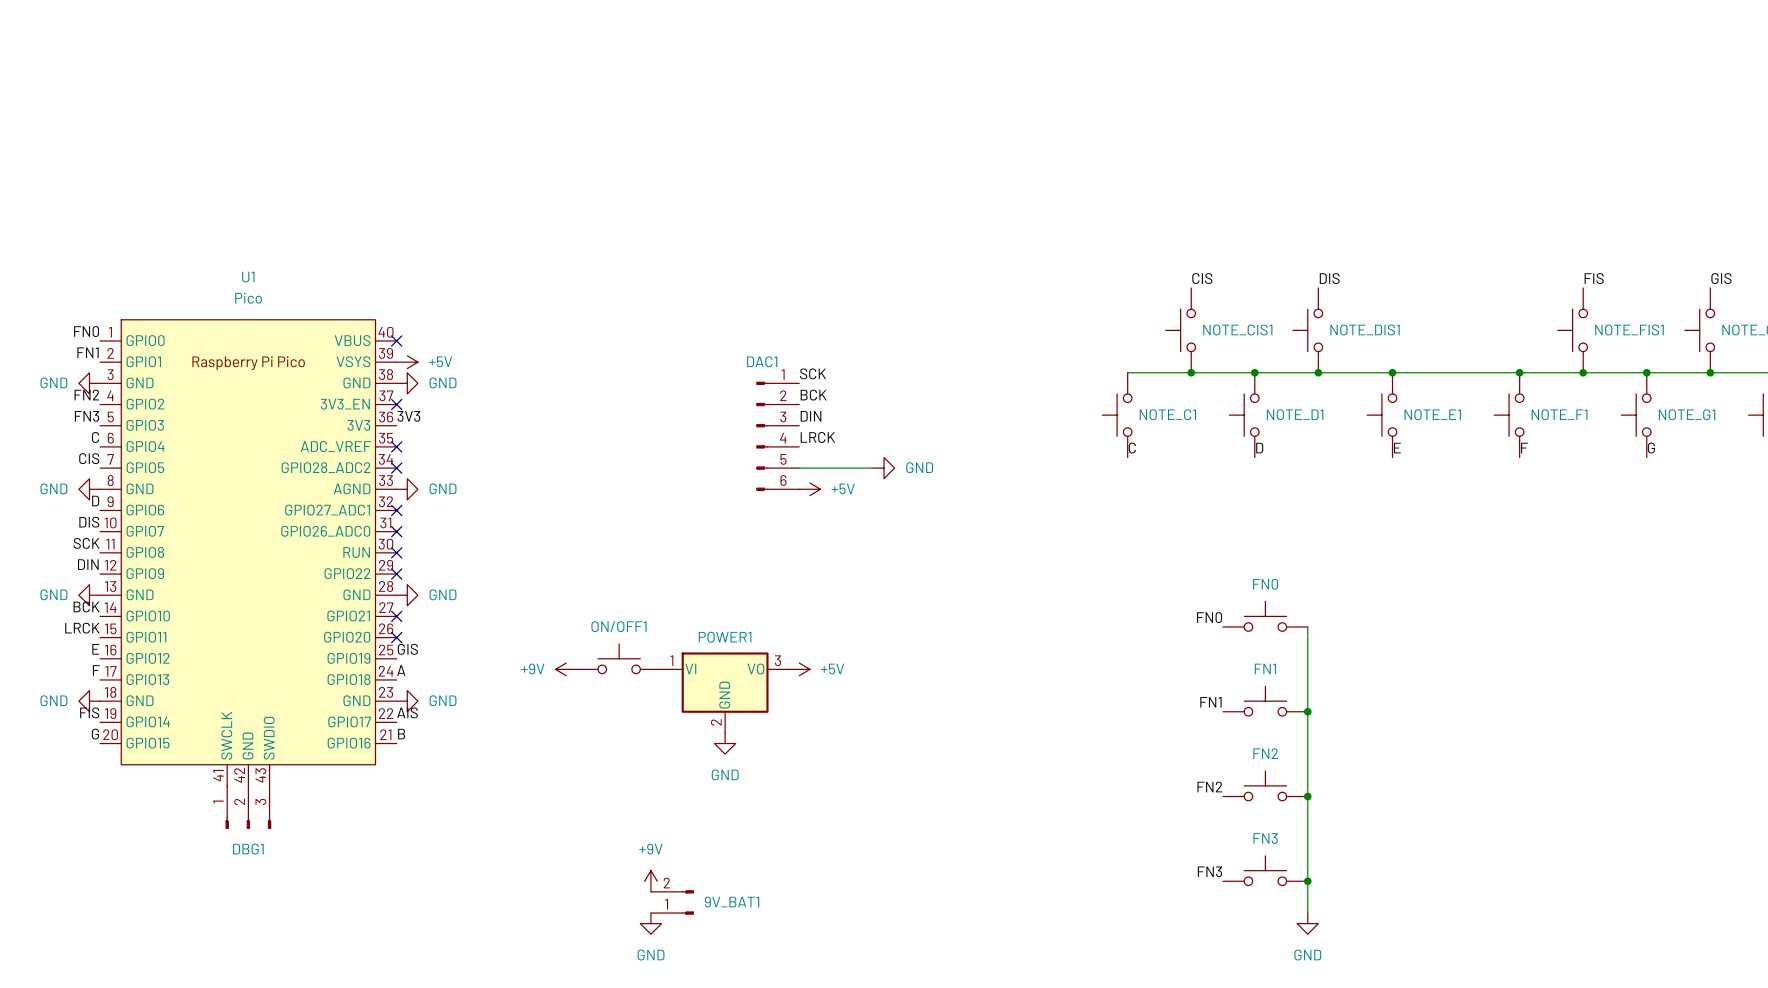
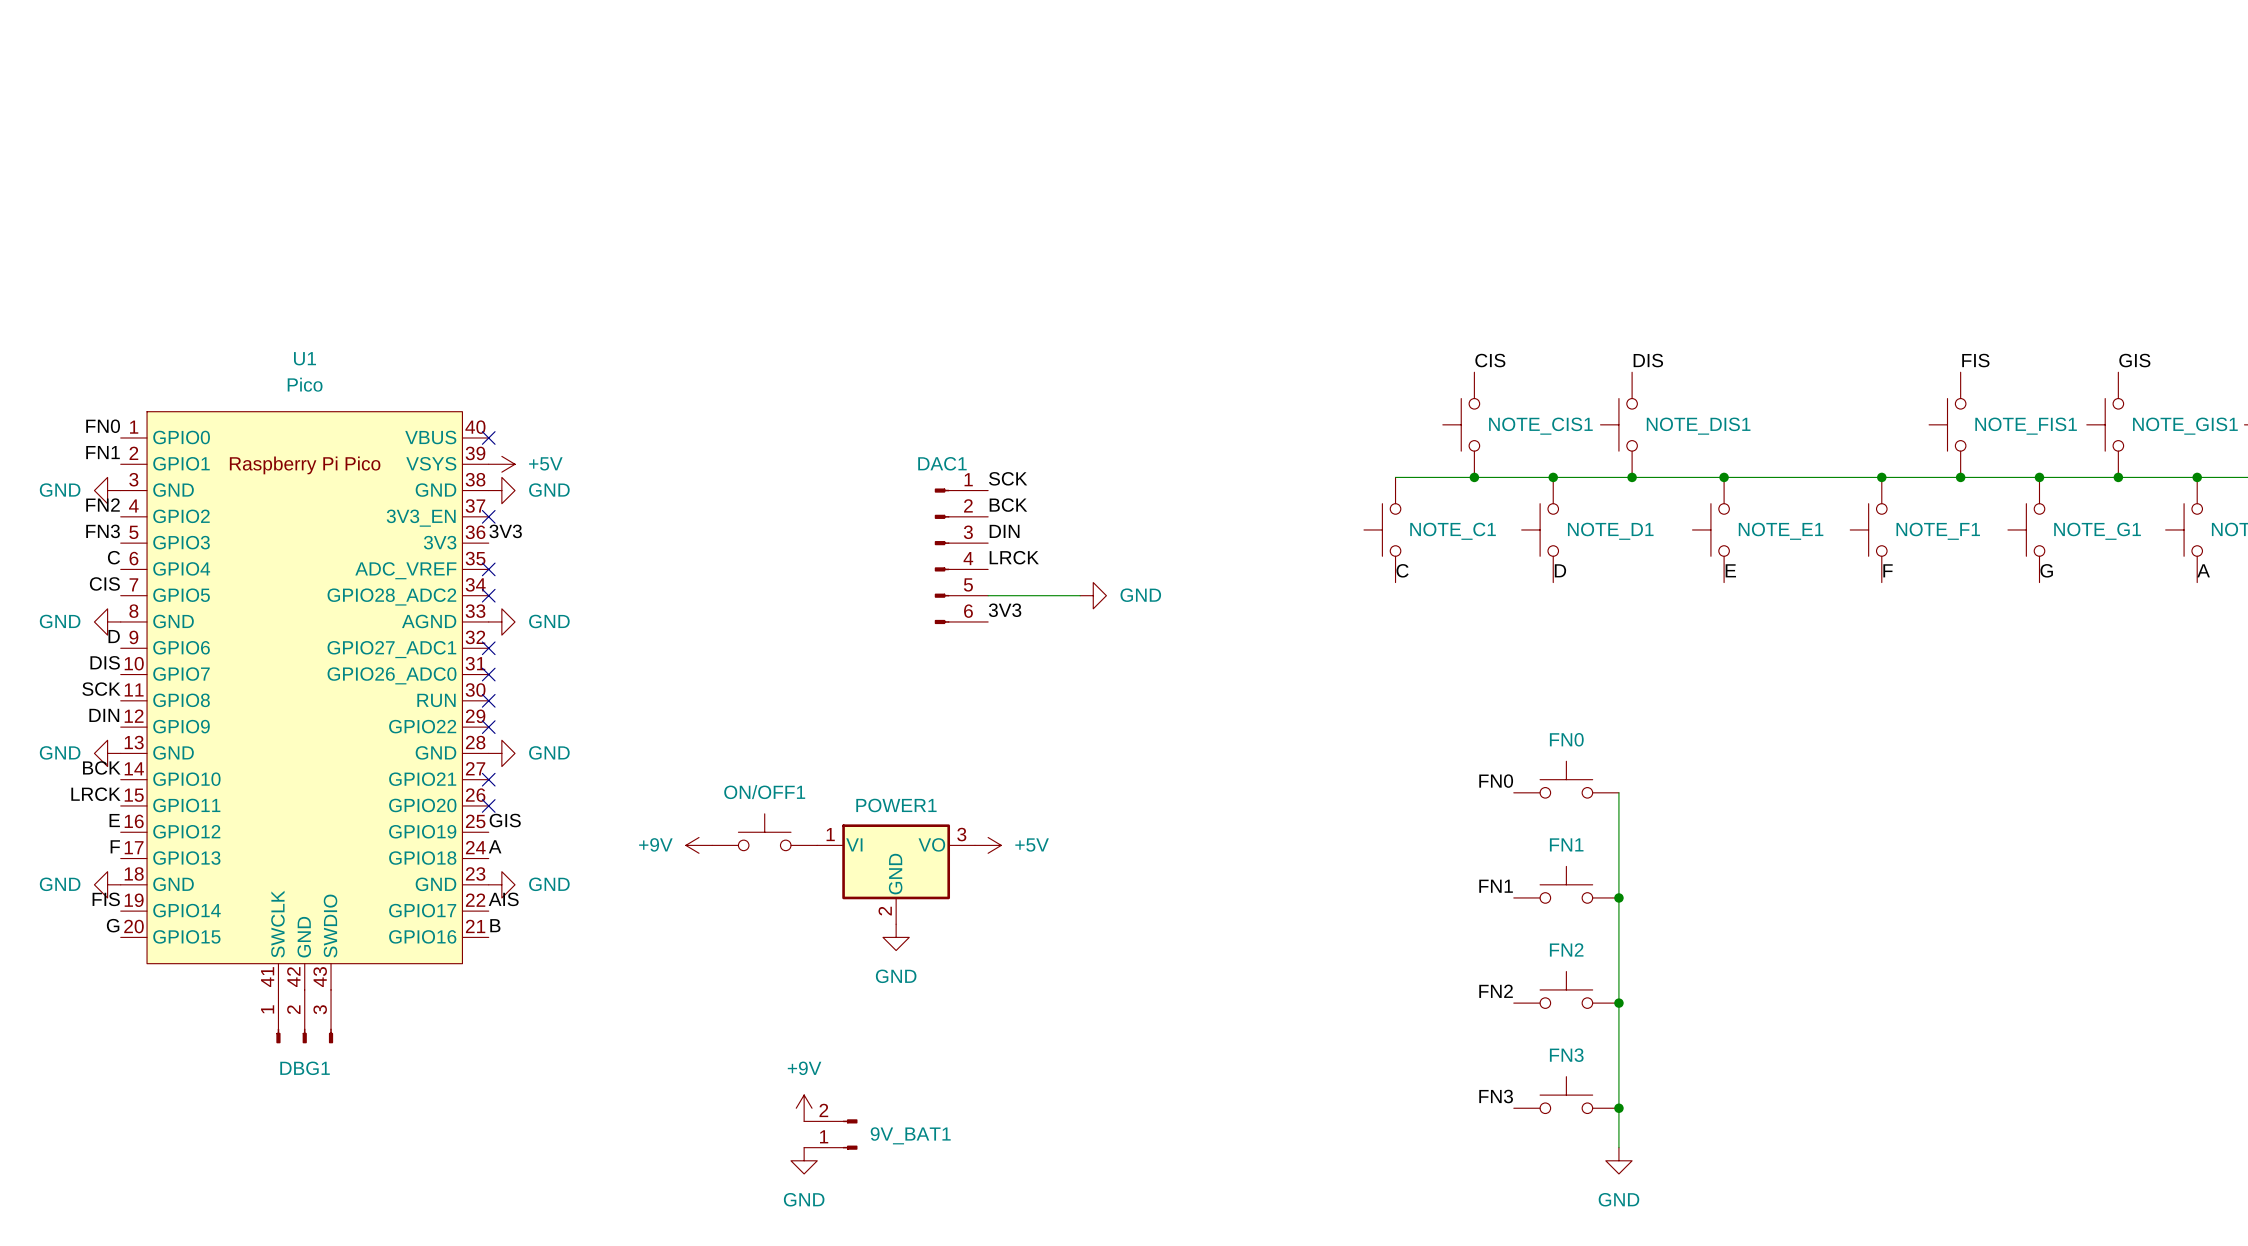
label: none -> 3V3 (1005, 610)
power symbol: +5V (809, 489) -> none

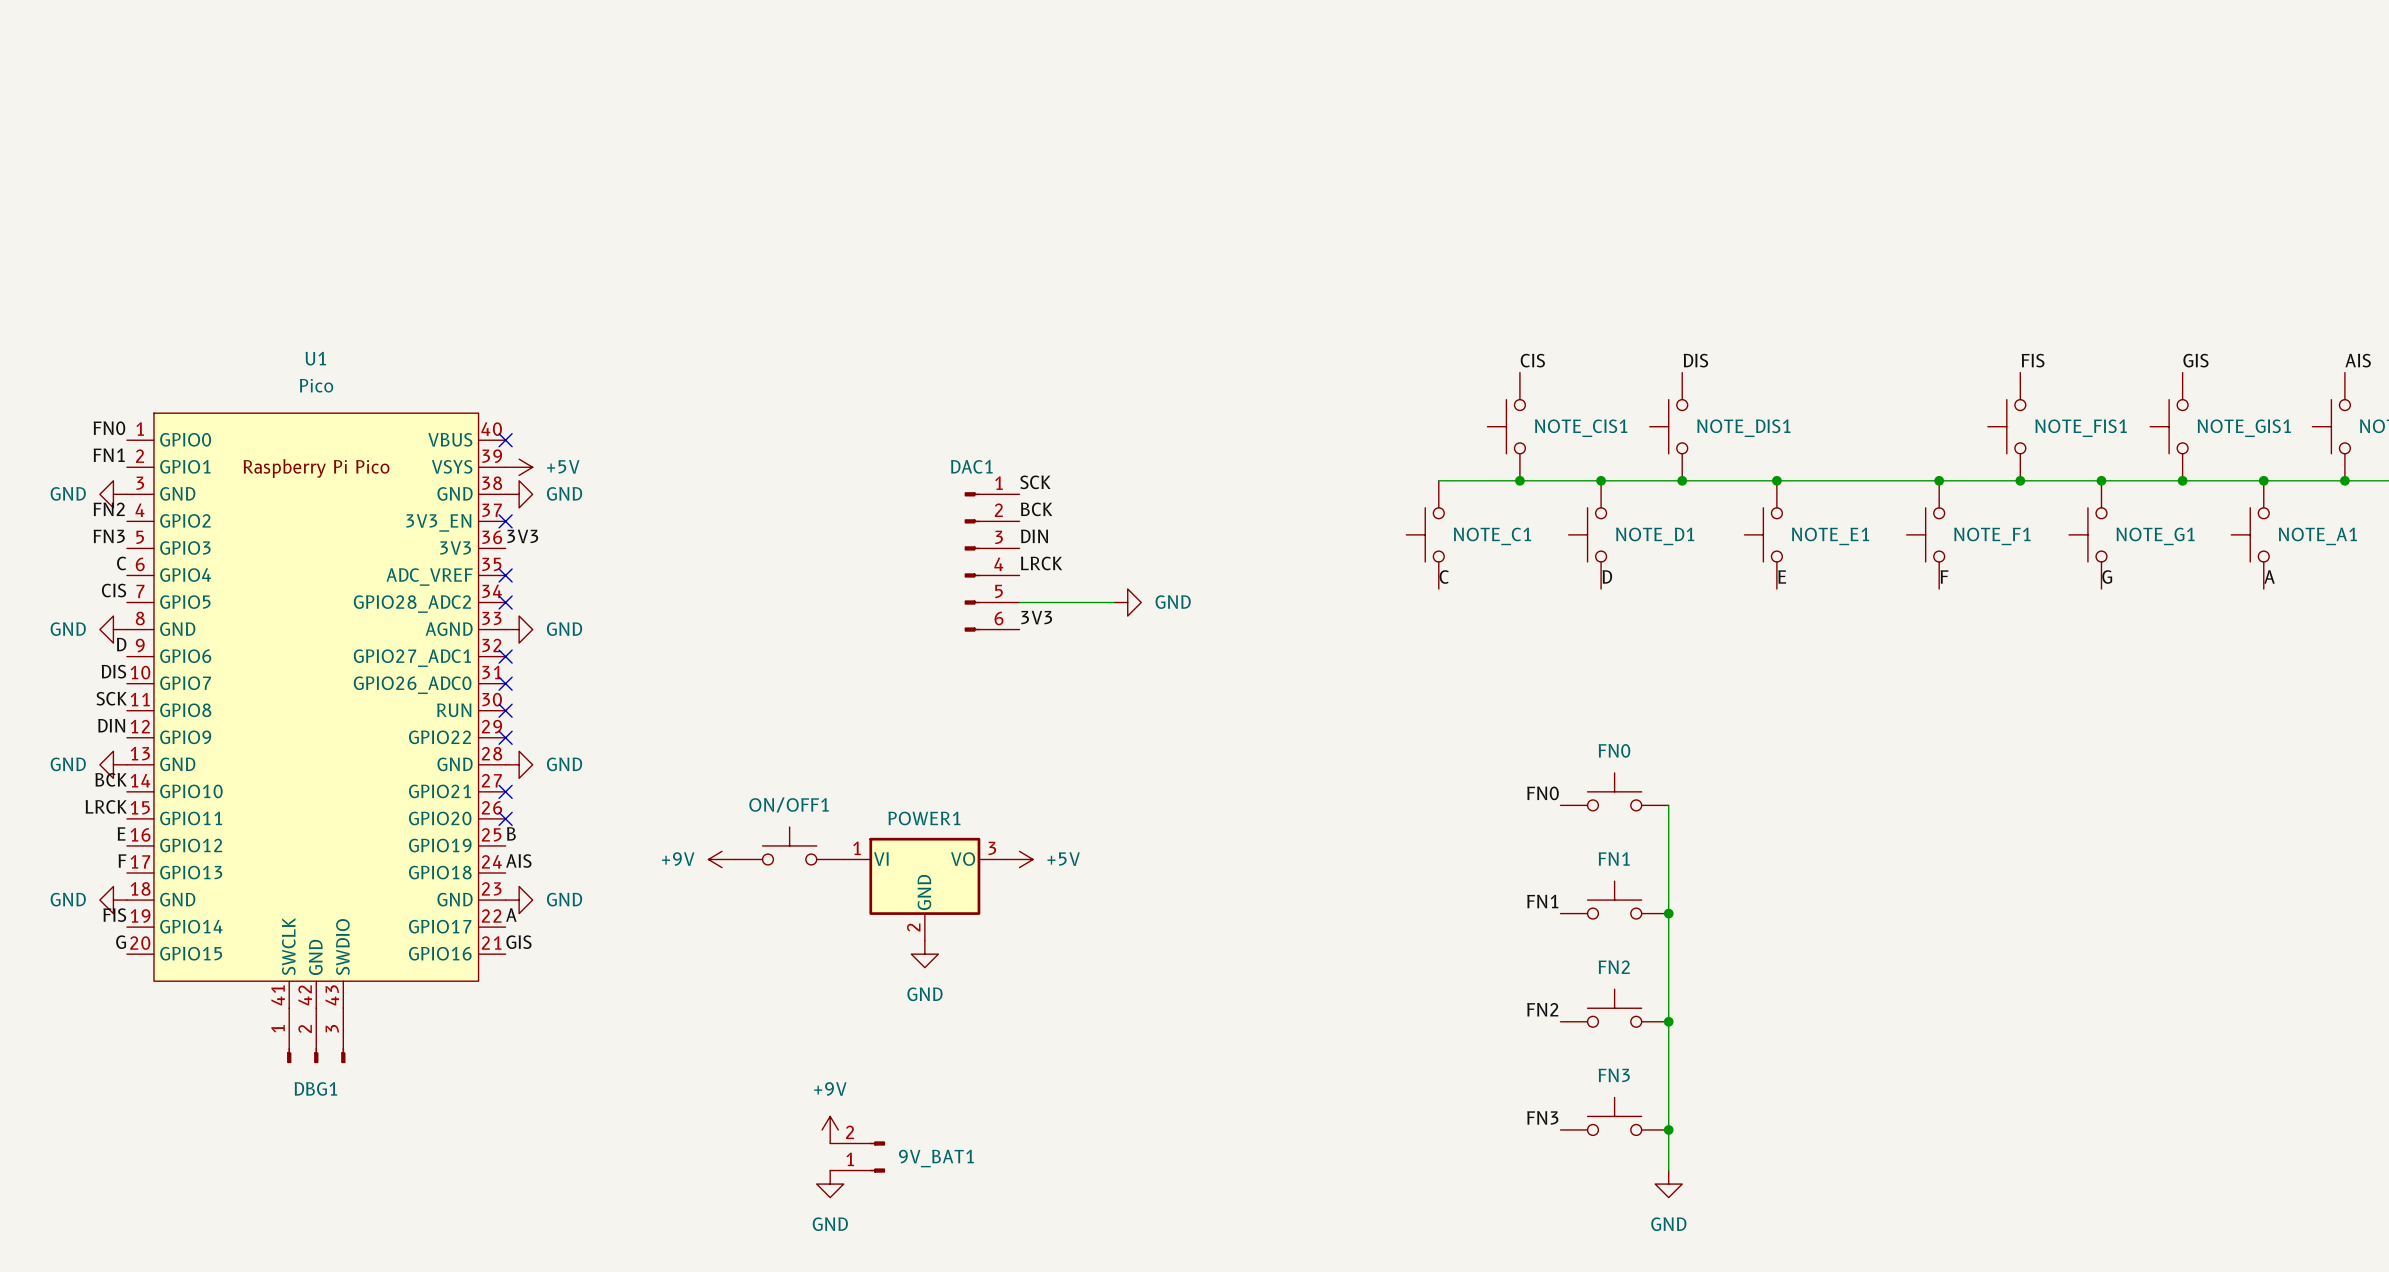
label: GIS (505, 820) -> B (511, 833)
label: A (495, 846) -> AIS (518, 861)
label: AIS (503, 899) -> A (511, 915)
label: B (495, 925) -> GIS (518, 942)

